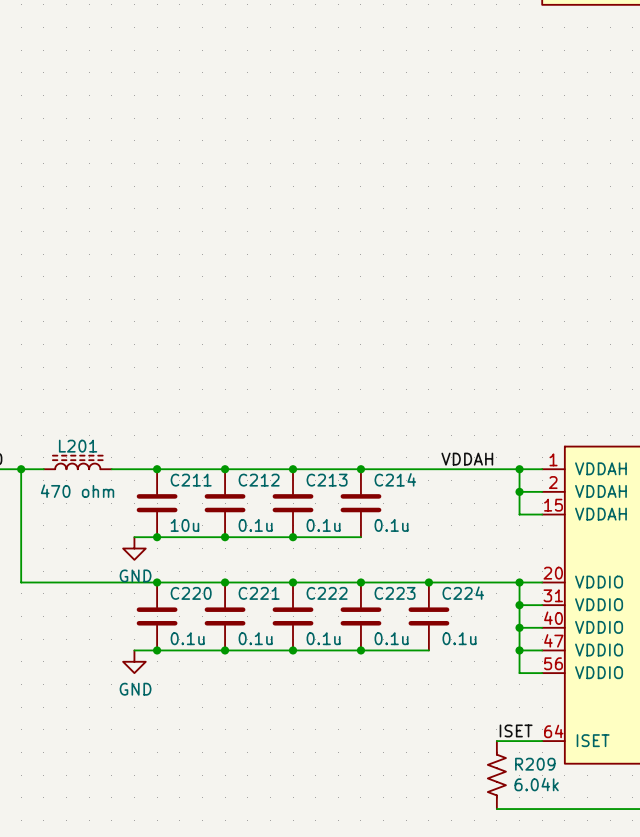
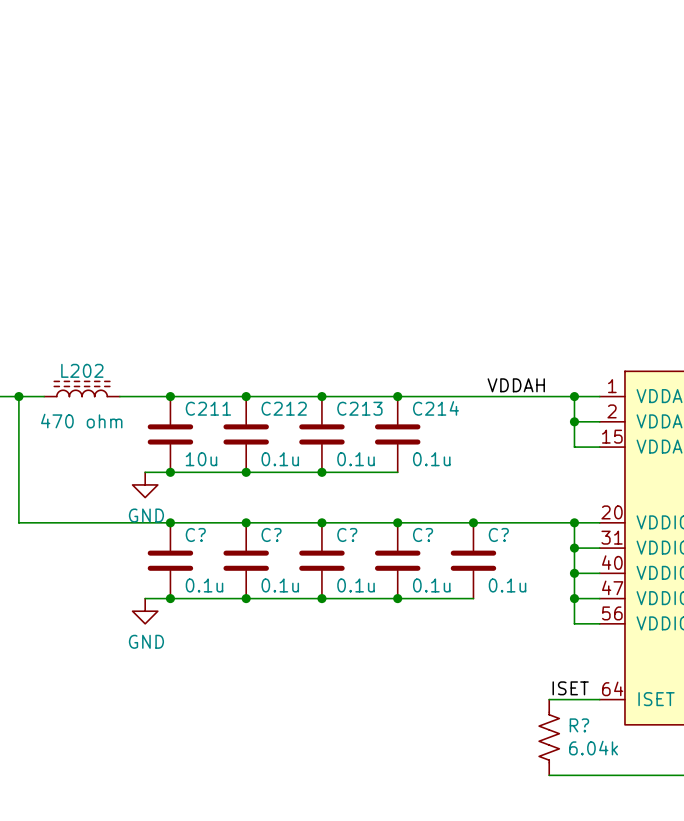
L201 name: L201 (78, 446) -> L202 (82, 370)
C220 name: C220 (191, 593) -> C? (195, 534)
C221 name: C221 (259, 593) -> C? (271, 534)
C222 name: C222 (327, 593) -> C? (347, 534)
C223 name: C223 (395, 593) -> C? (423, 534)
C224 name: C224 (463, 593) -> C? (498, 534)
R209 name: R209 (535, 764) -> R? (579, 725)

